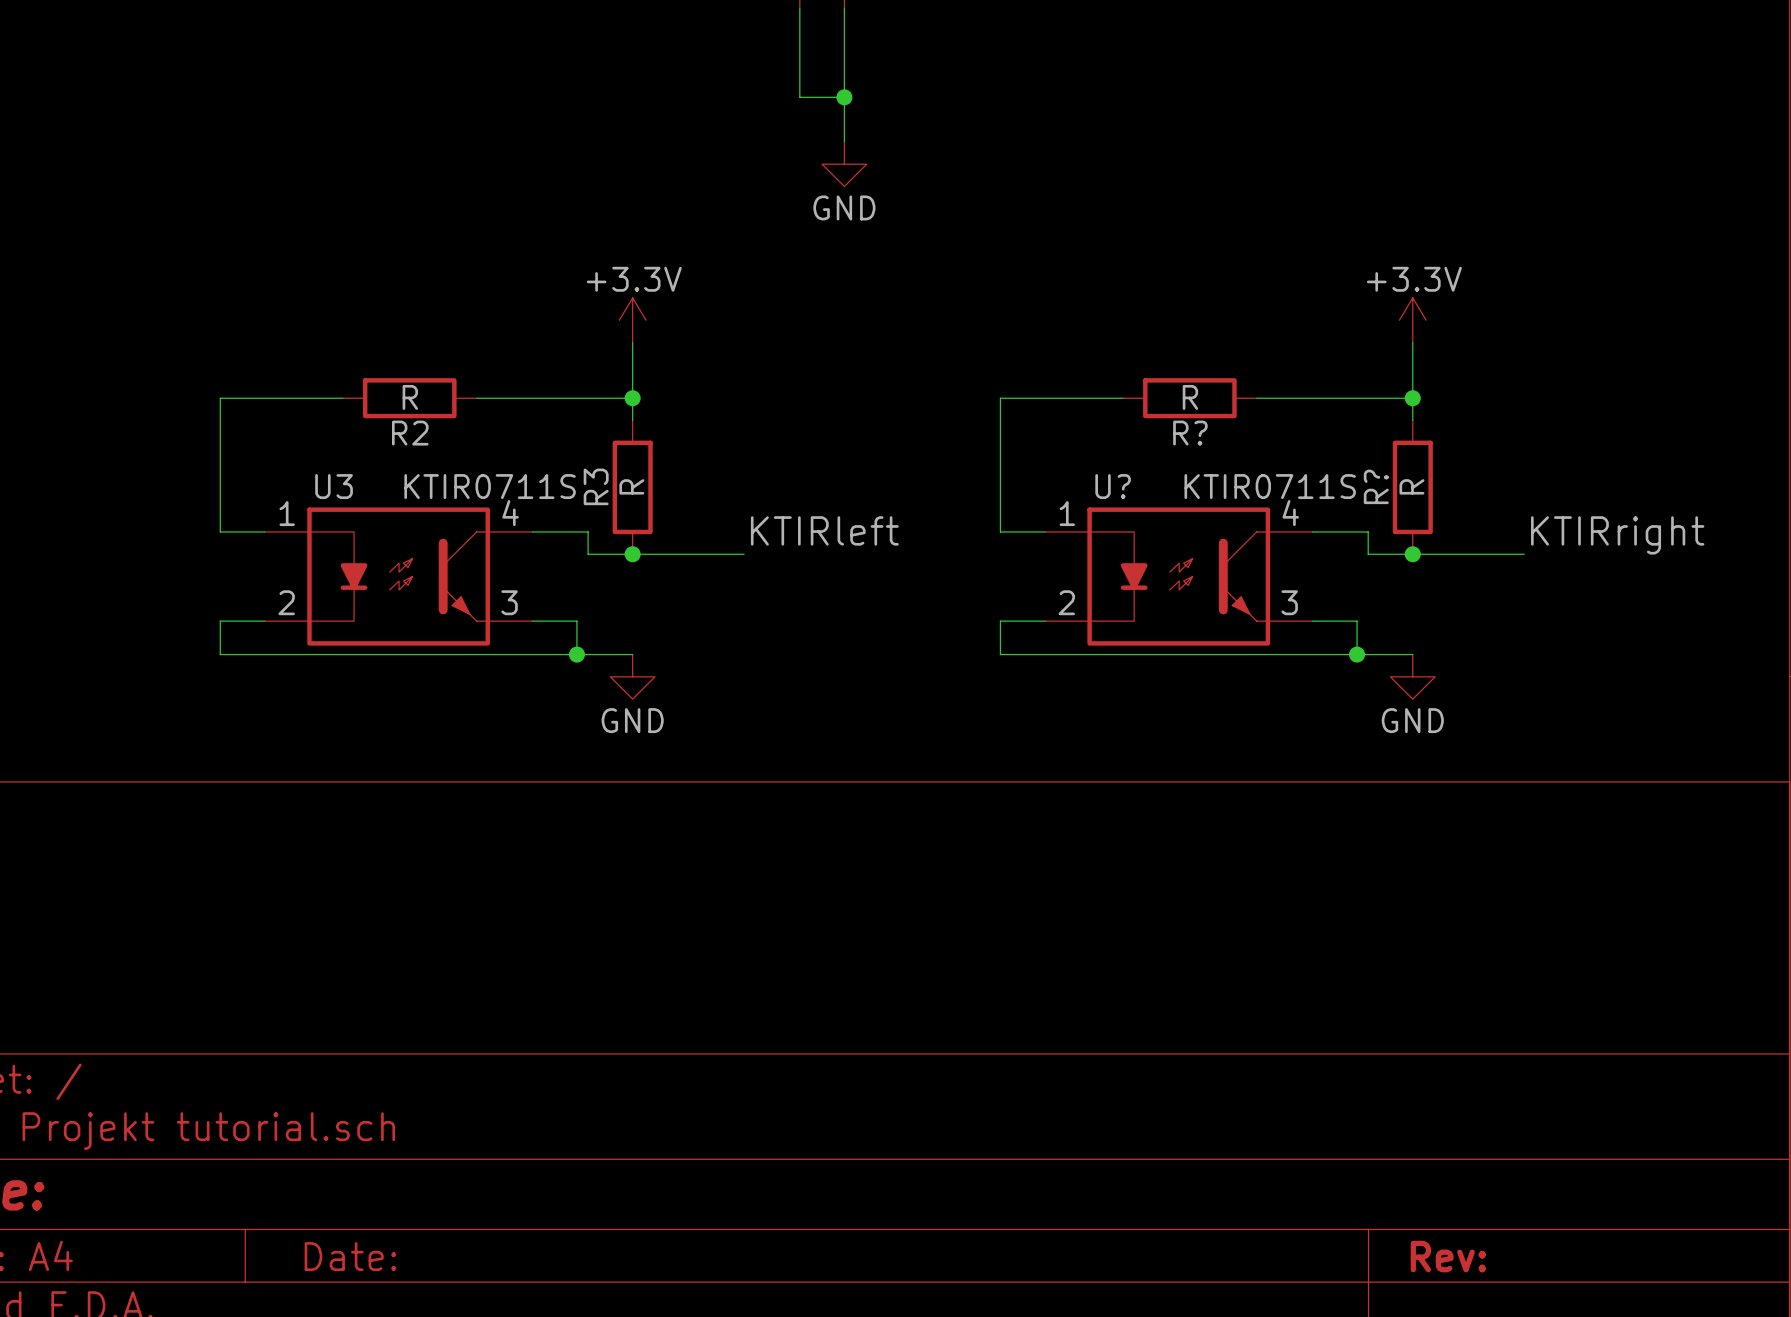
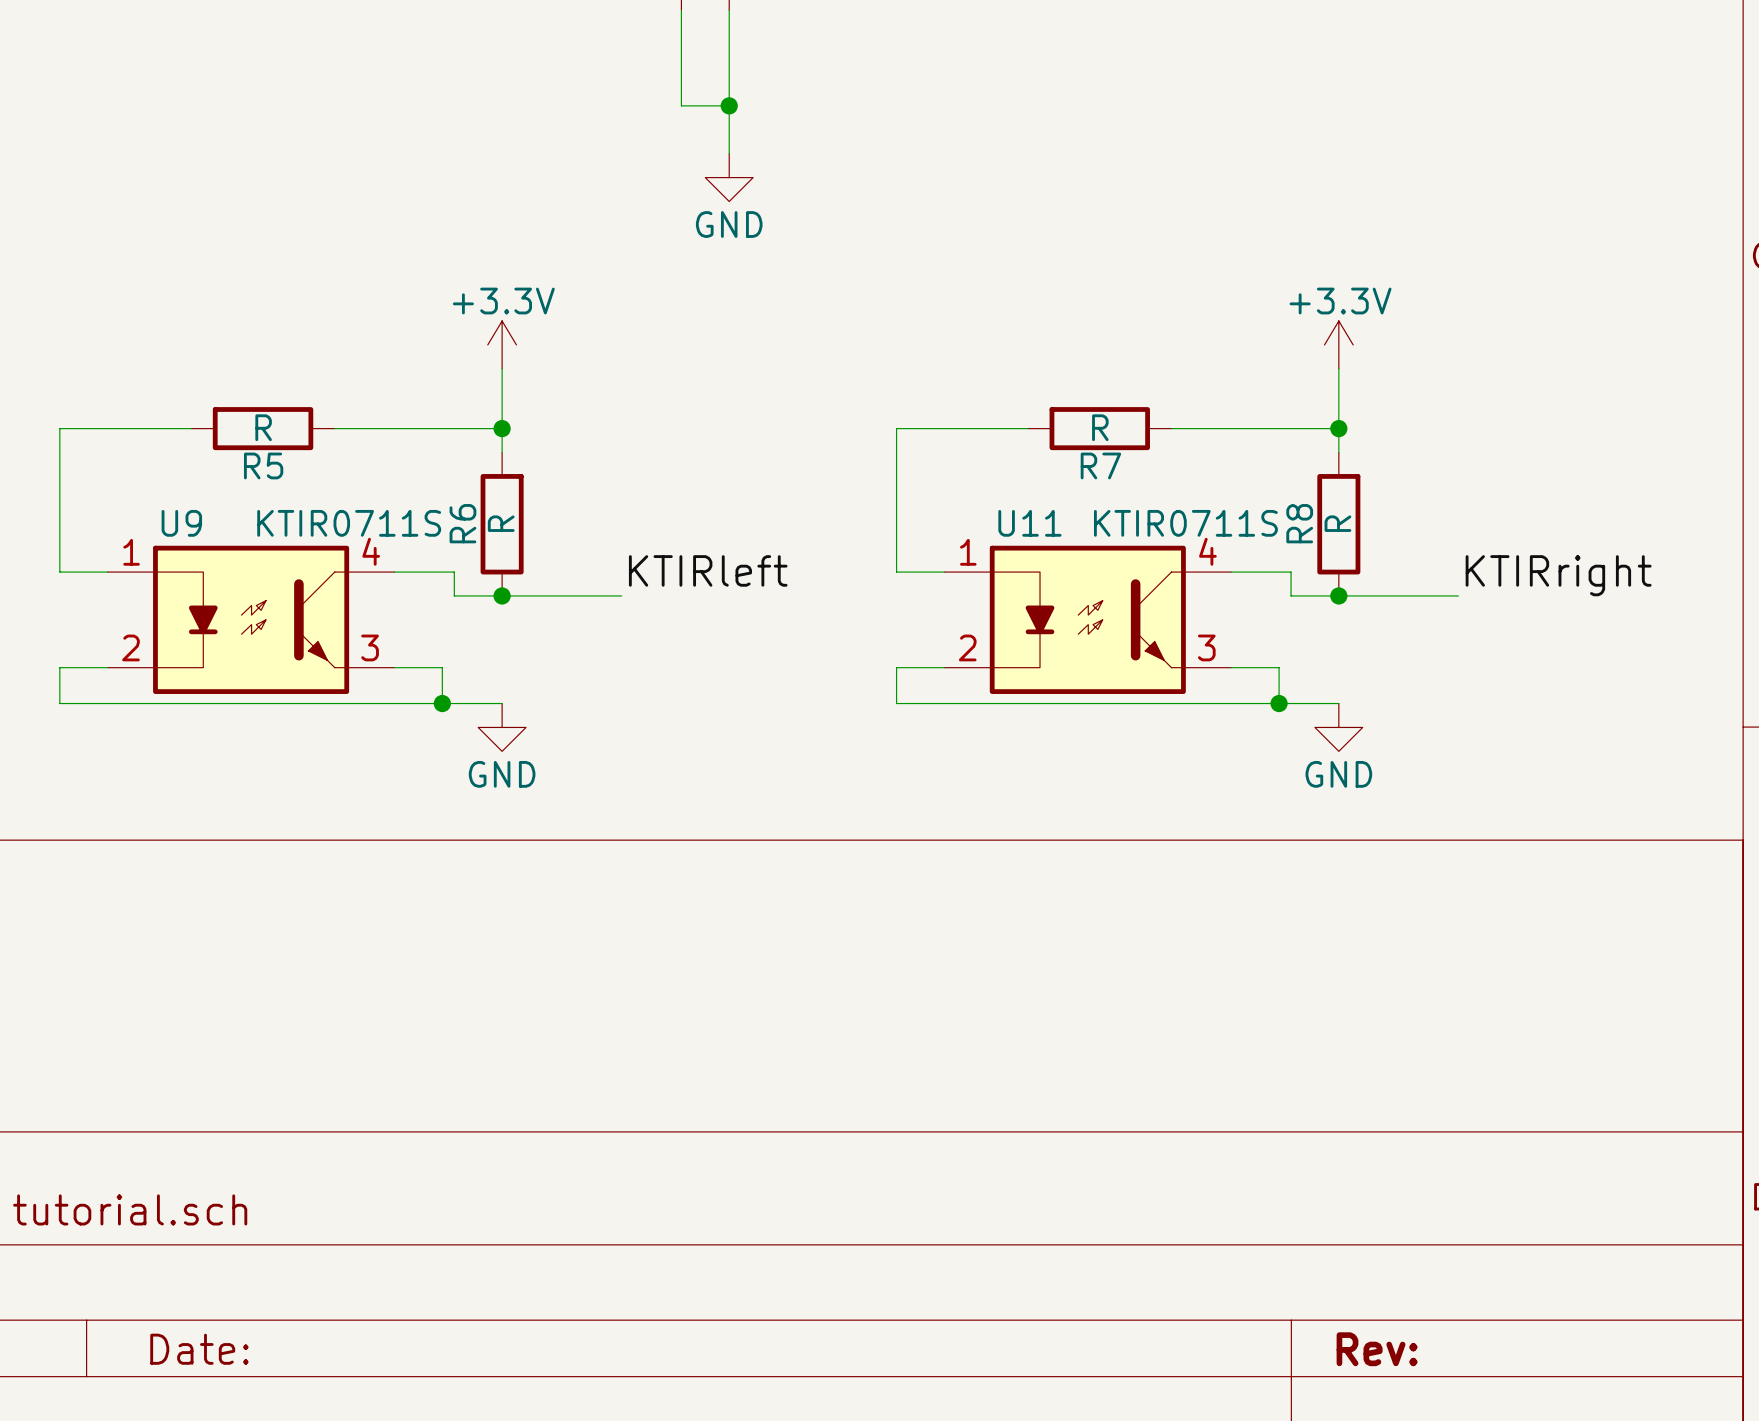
R2 name: R2 (410, 433) -> R5 (263, 465)
R? name: R? (1190, 433) -> R7 (1100, 465)
U3 name: U3 (334, 486) -> U9 (181, 523)
R3 name: R3 (596, 486) -> R6 (462, 523)
U? name: U? (1113, 486) -> U11 (1029, 523)
R? name: R? (1376, 486) -> R8 (1299, 523)

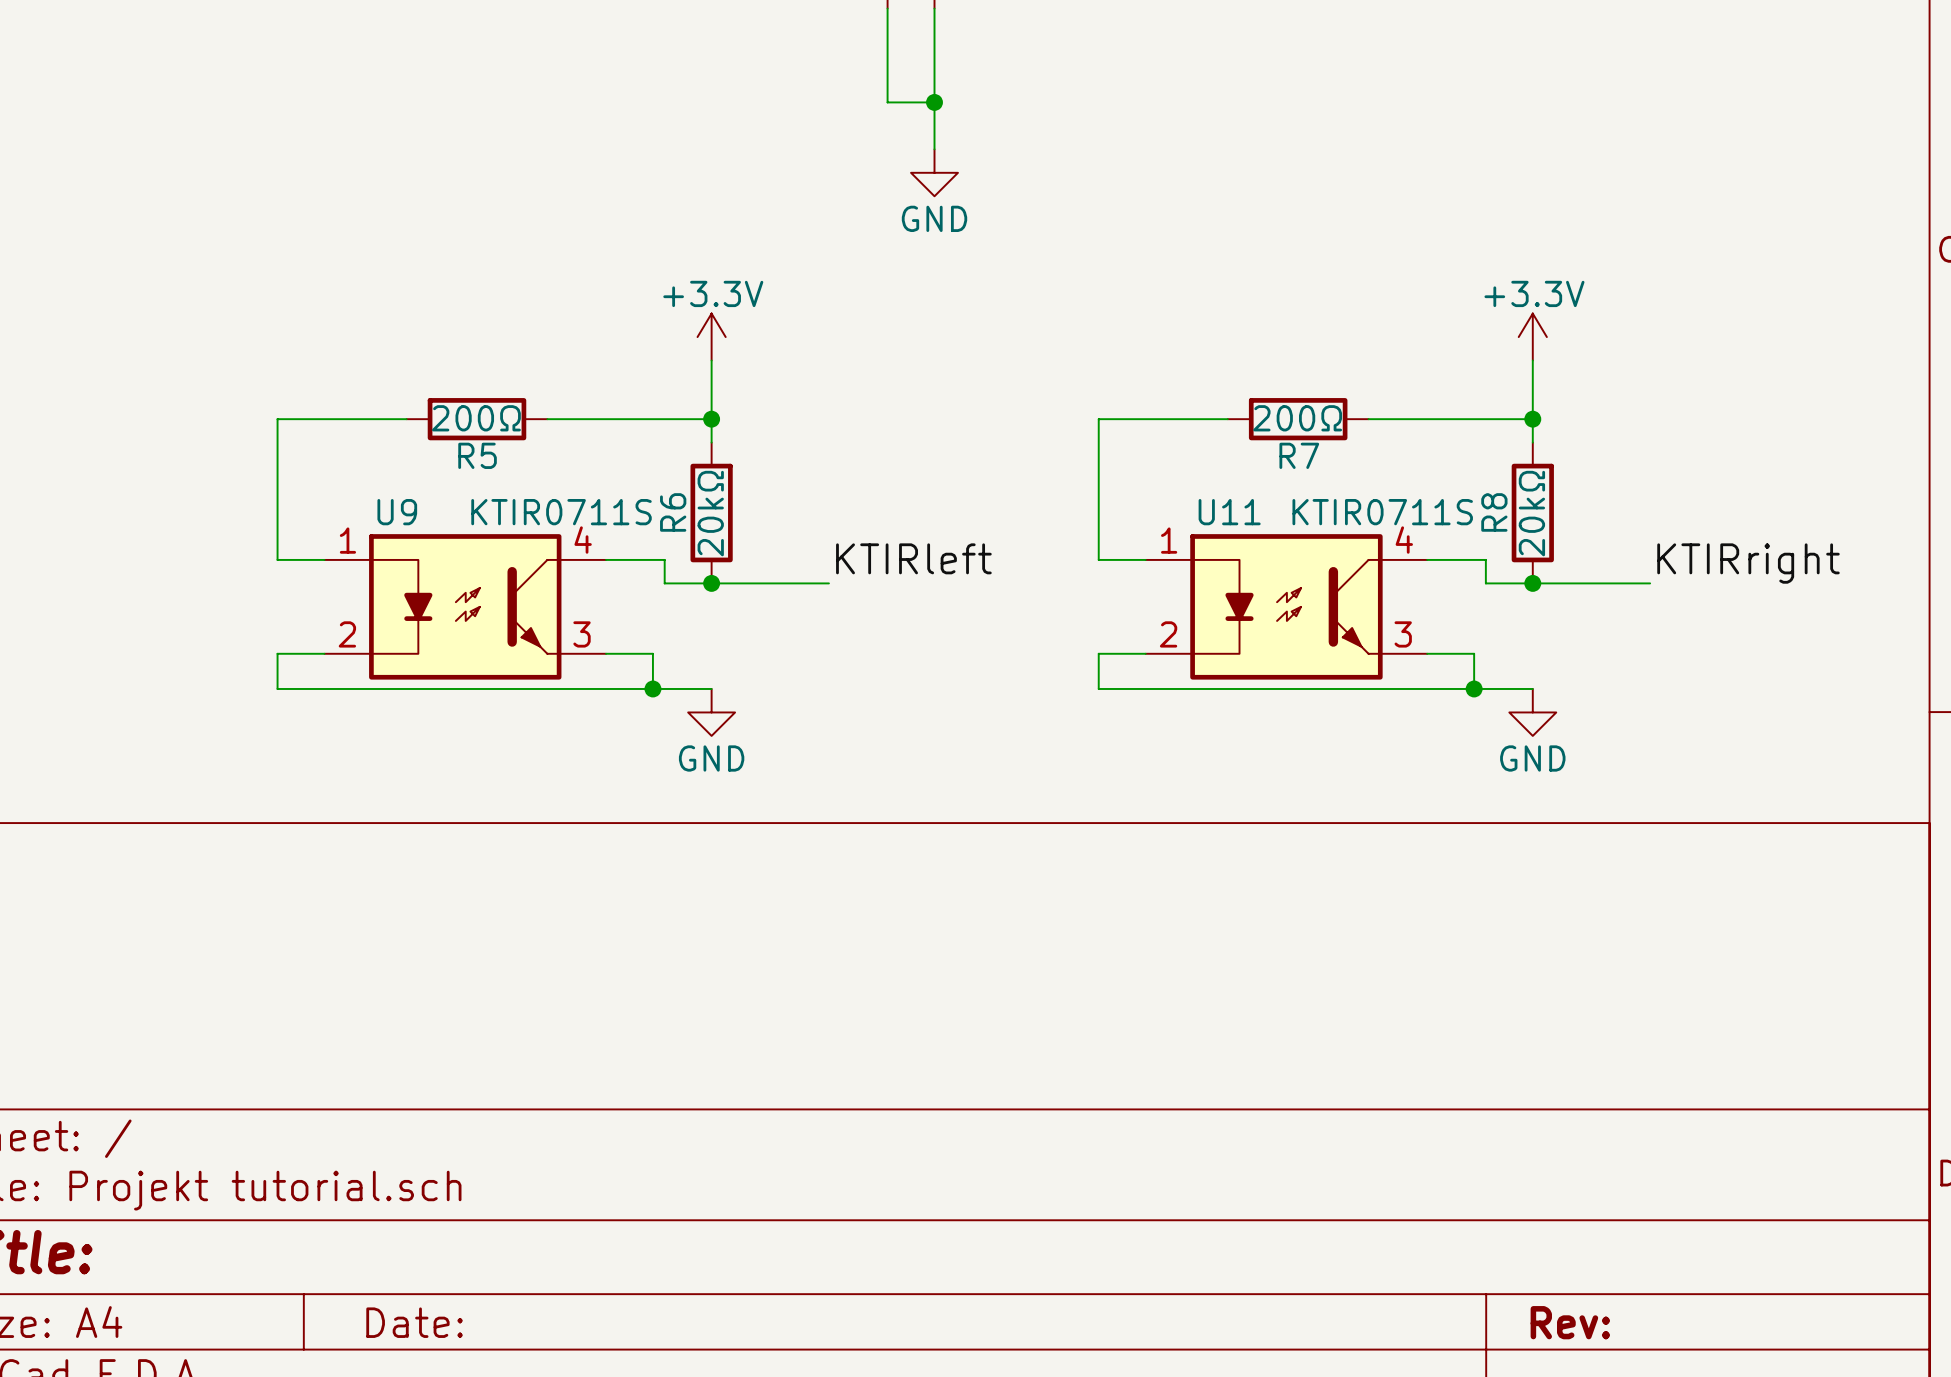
R5 value: R (263, 427) -> 200Ω (476, 418)
R7 value: R (1100, 427) -> 200Ω (1297, 418)
R6 value: R (501, 523) -> 20kΩ (710, 513)
R8 value: R (1337, 523) -> 20kΩ (1531, 513)

